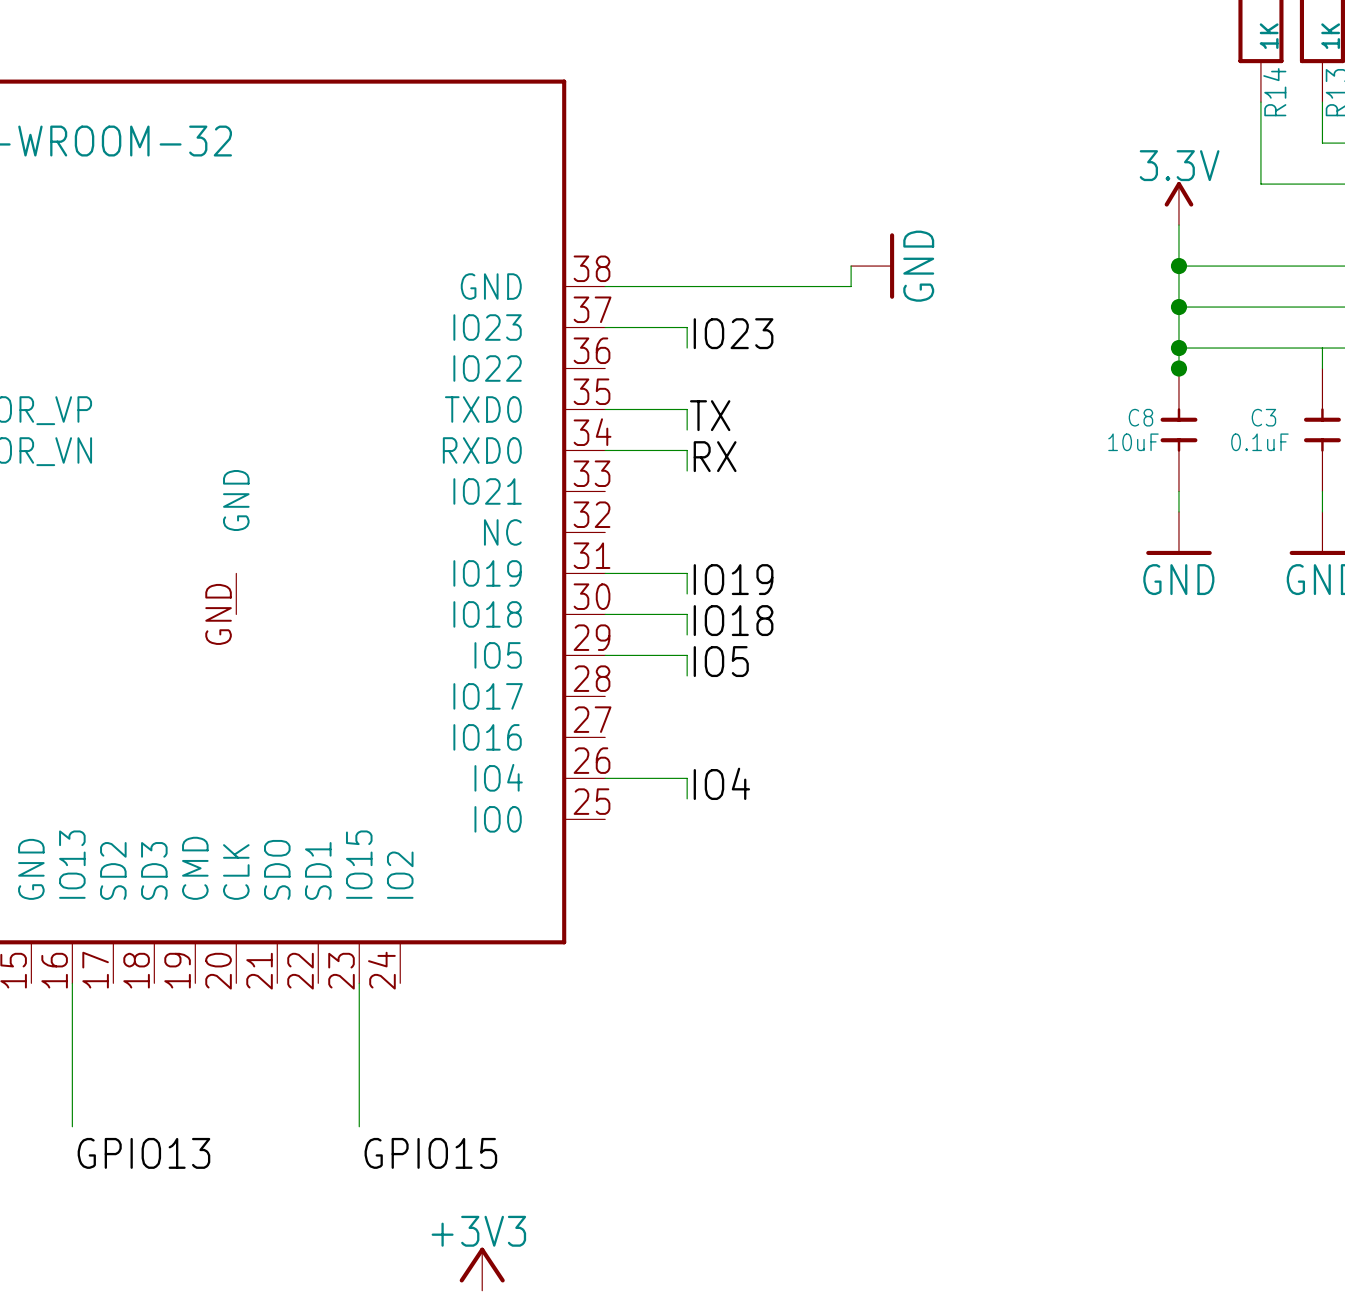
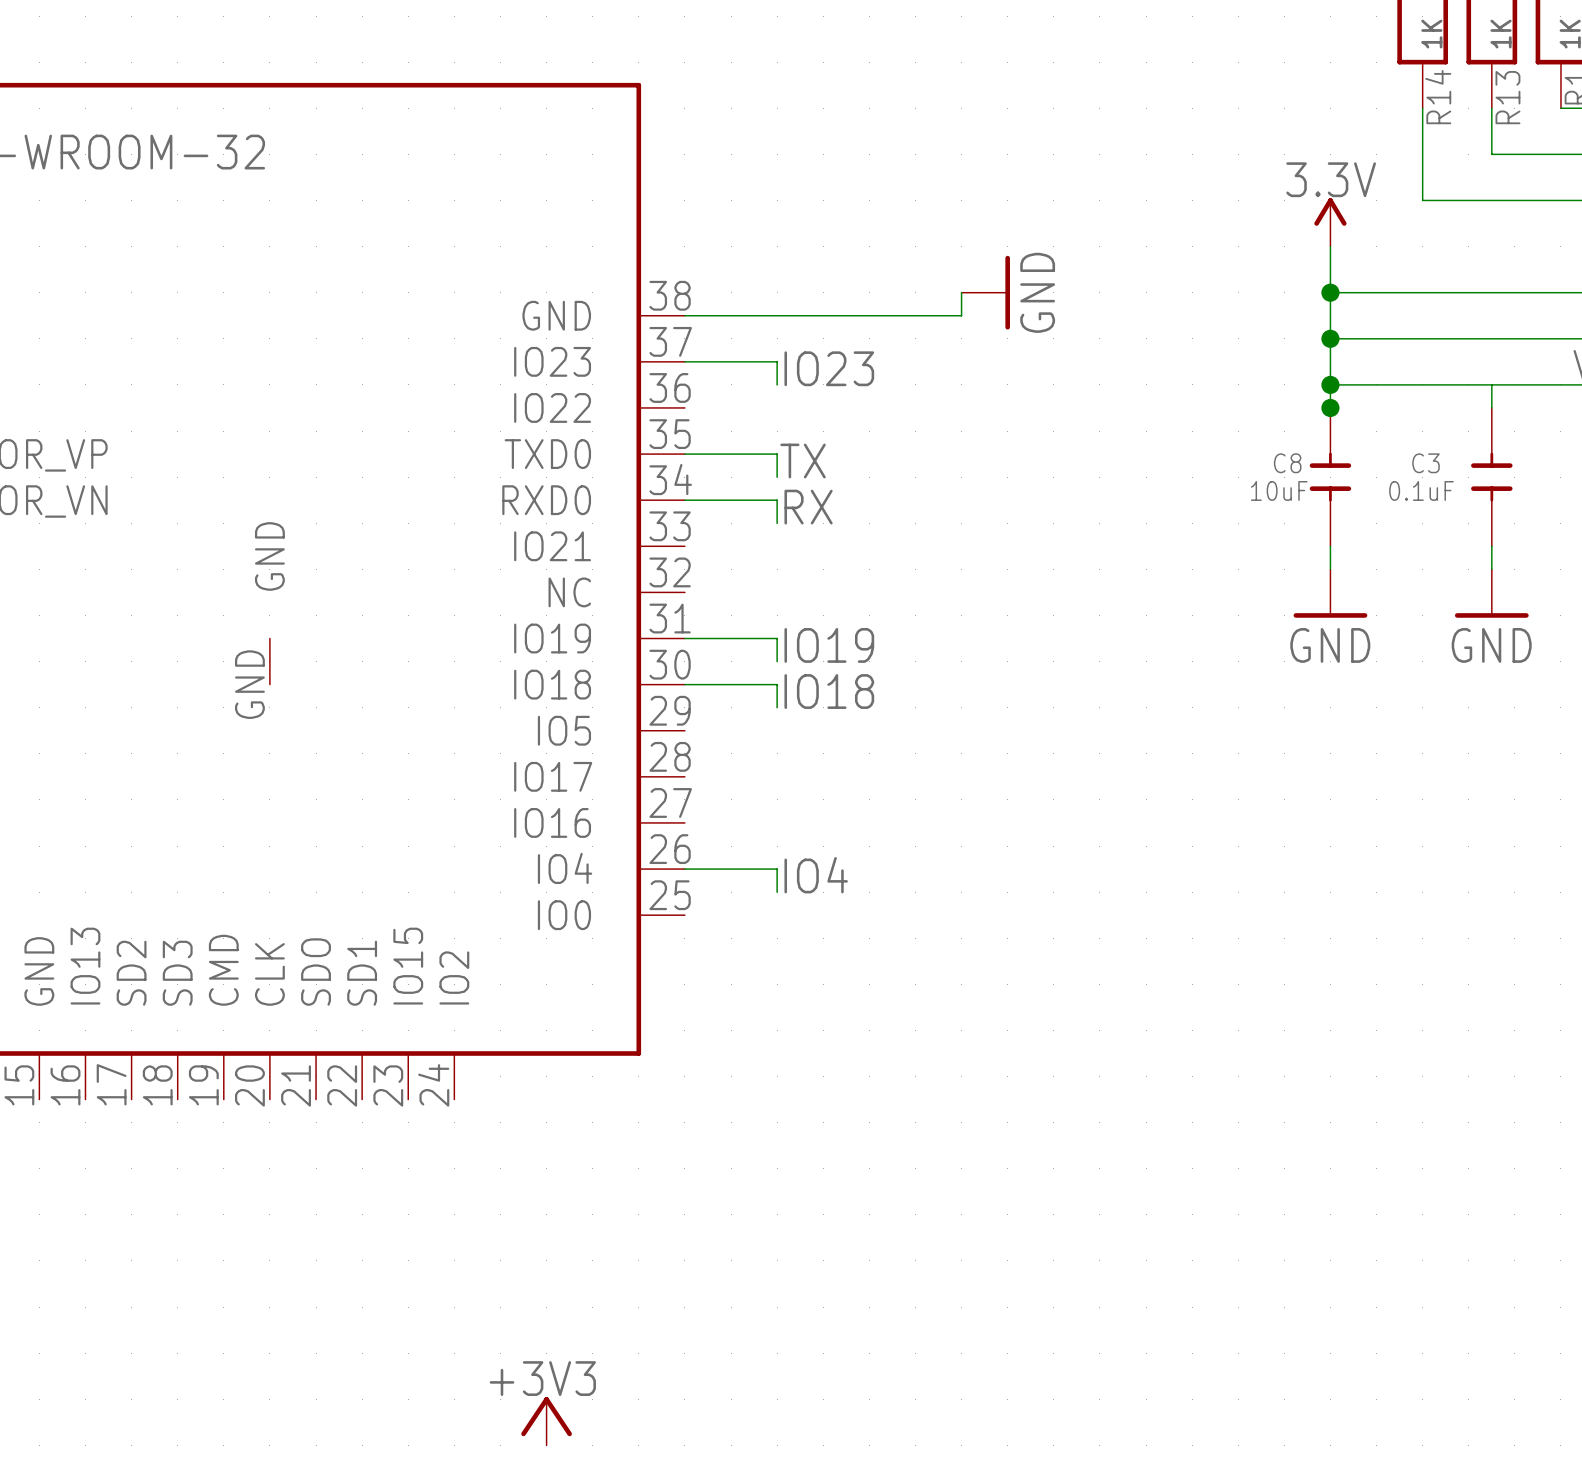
wire: (605, 655) (687, 655) (687, 675) -> none
label: IO5 (721, 661) -> none
wire: (72, 983) (72, 1126) -> none
wire: (359, 983) (359, 1126) -> none
label: GPIO13 (143, 1153) -> none
label: GPIO15 (430, 1153) -> none

